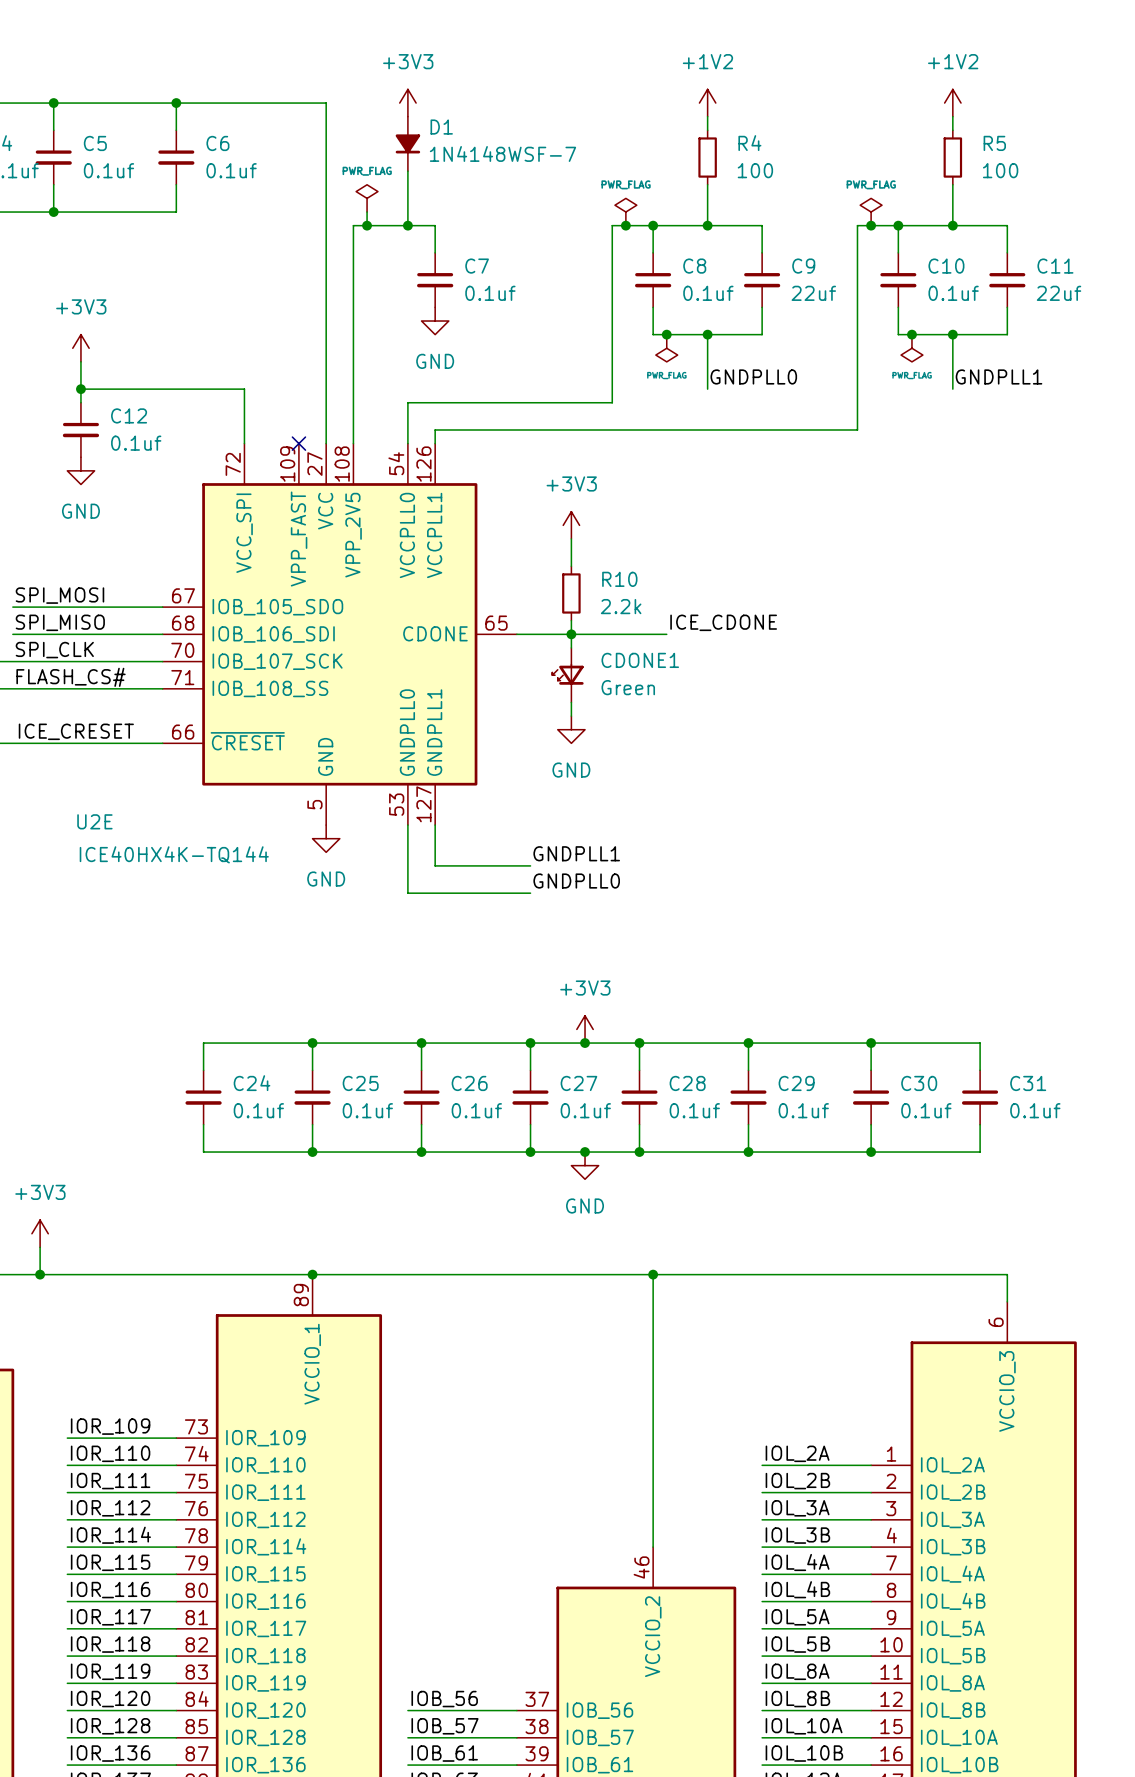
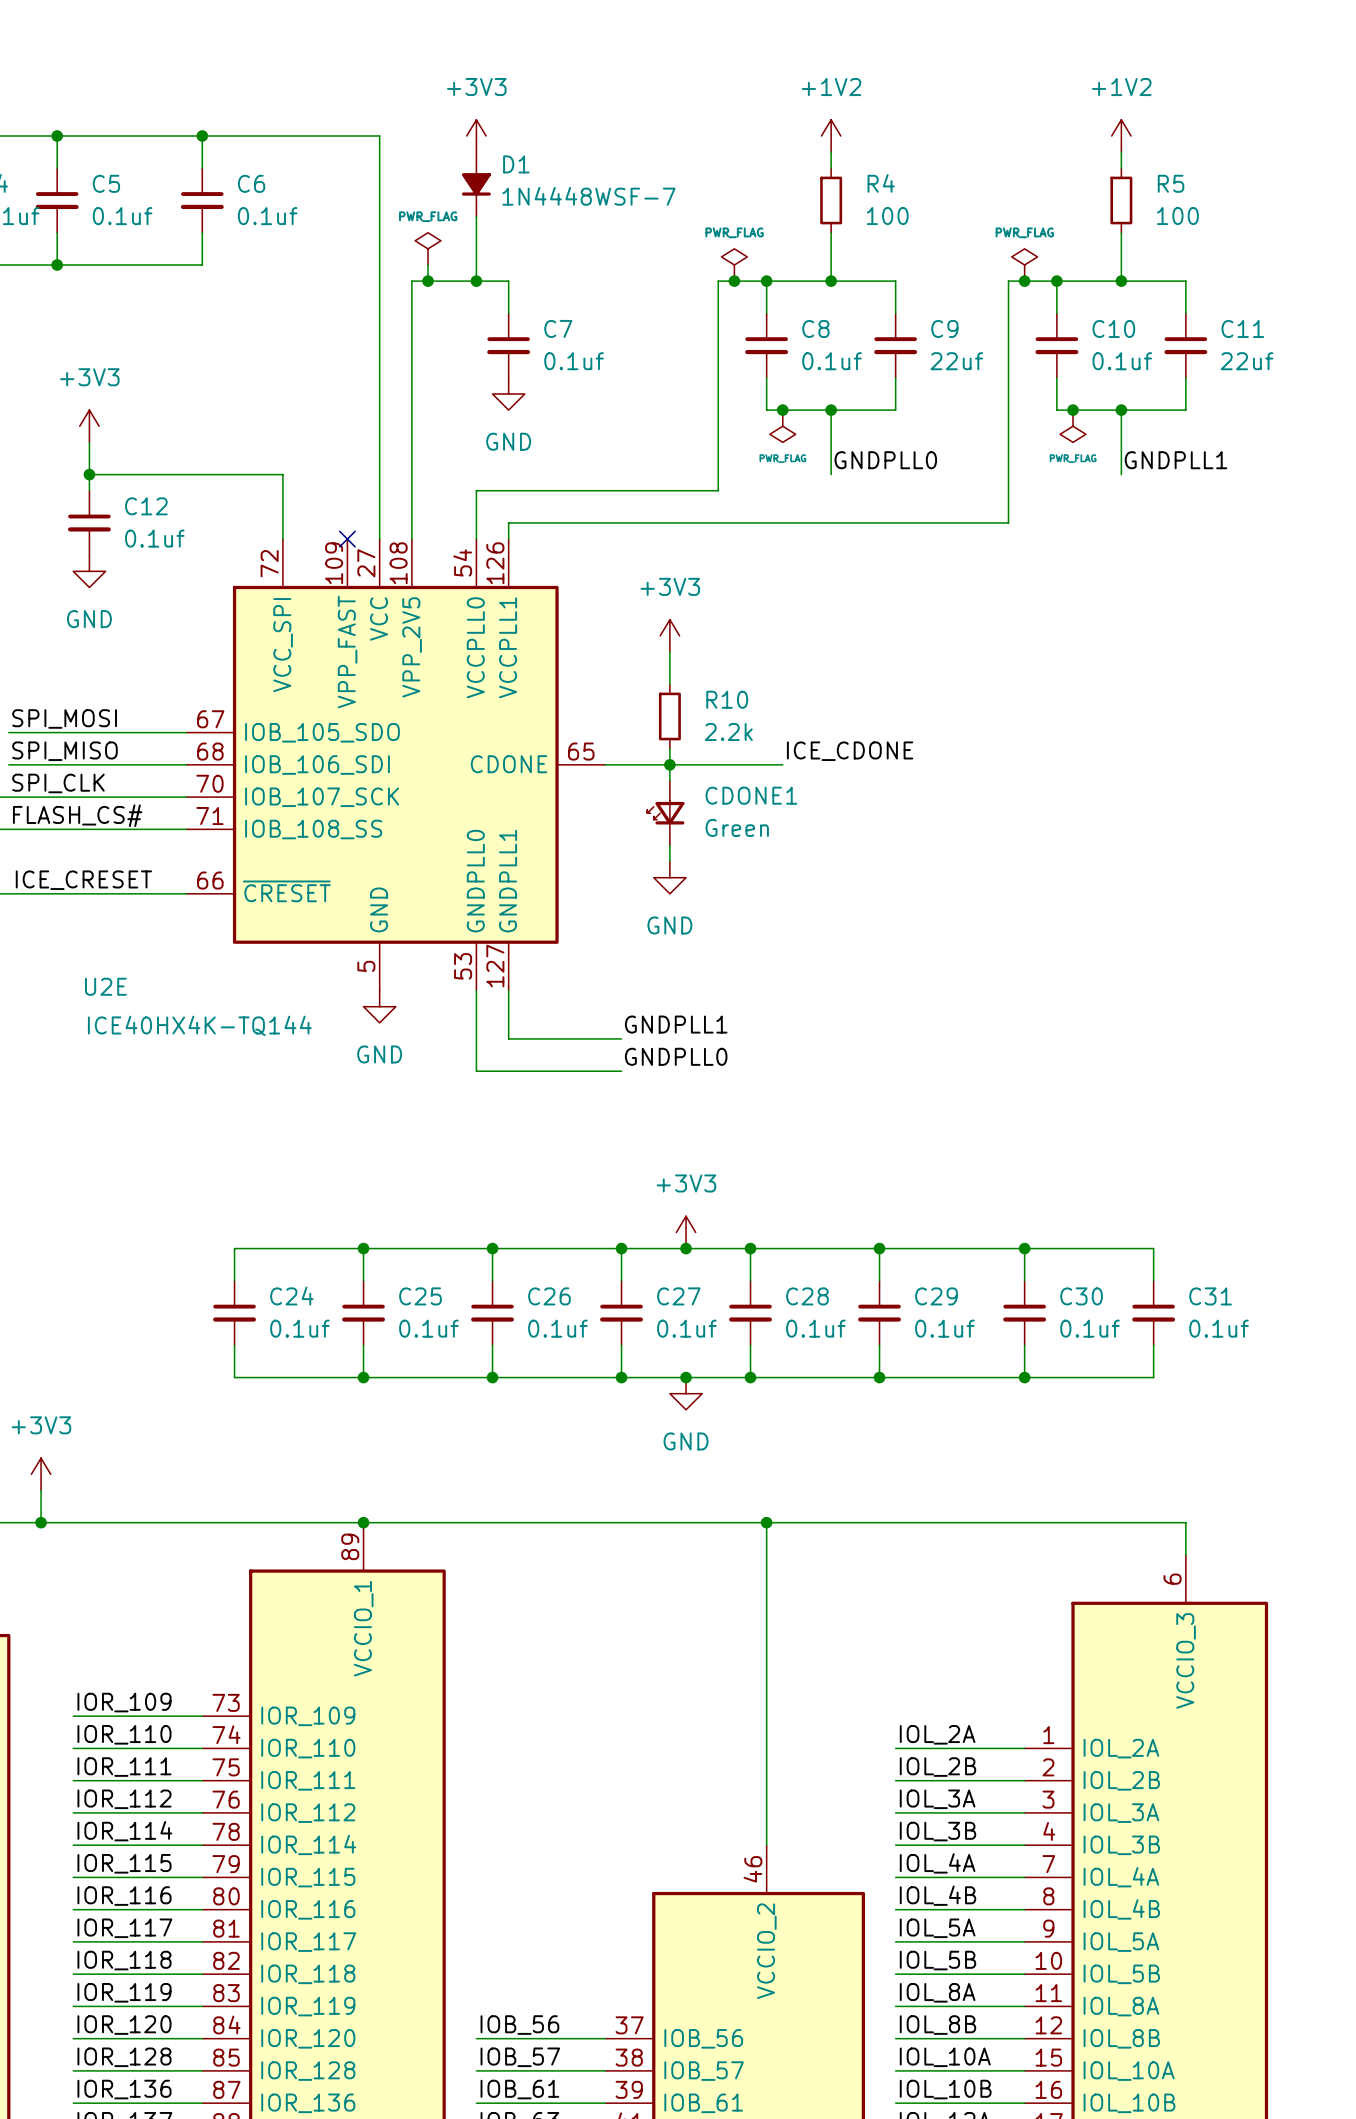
D1 value: 1N4148WSF-7 (502, 153) -> 1N4448WSF-7 (588, 196)

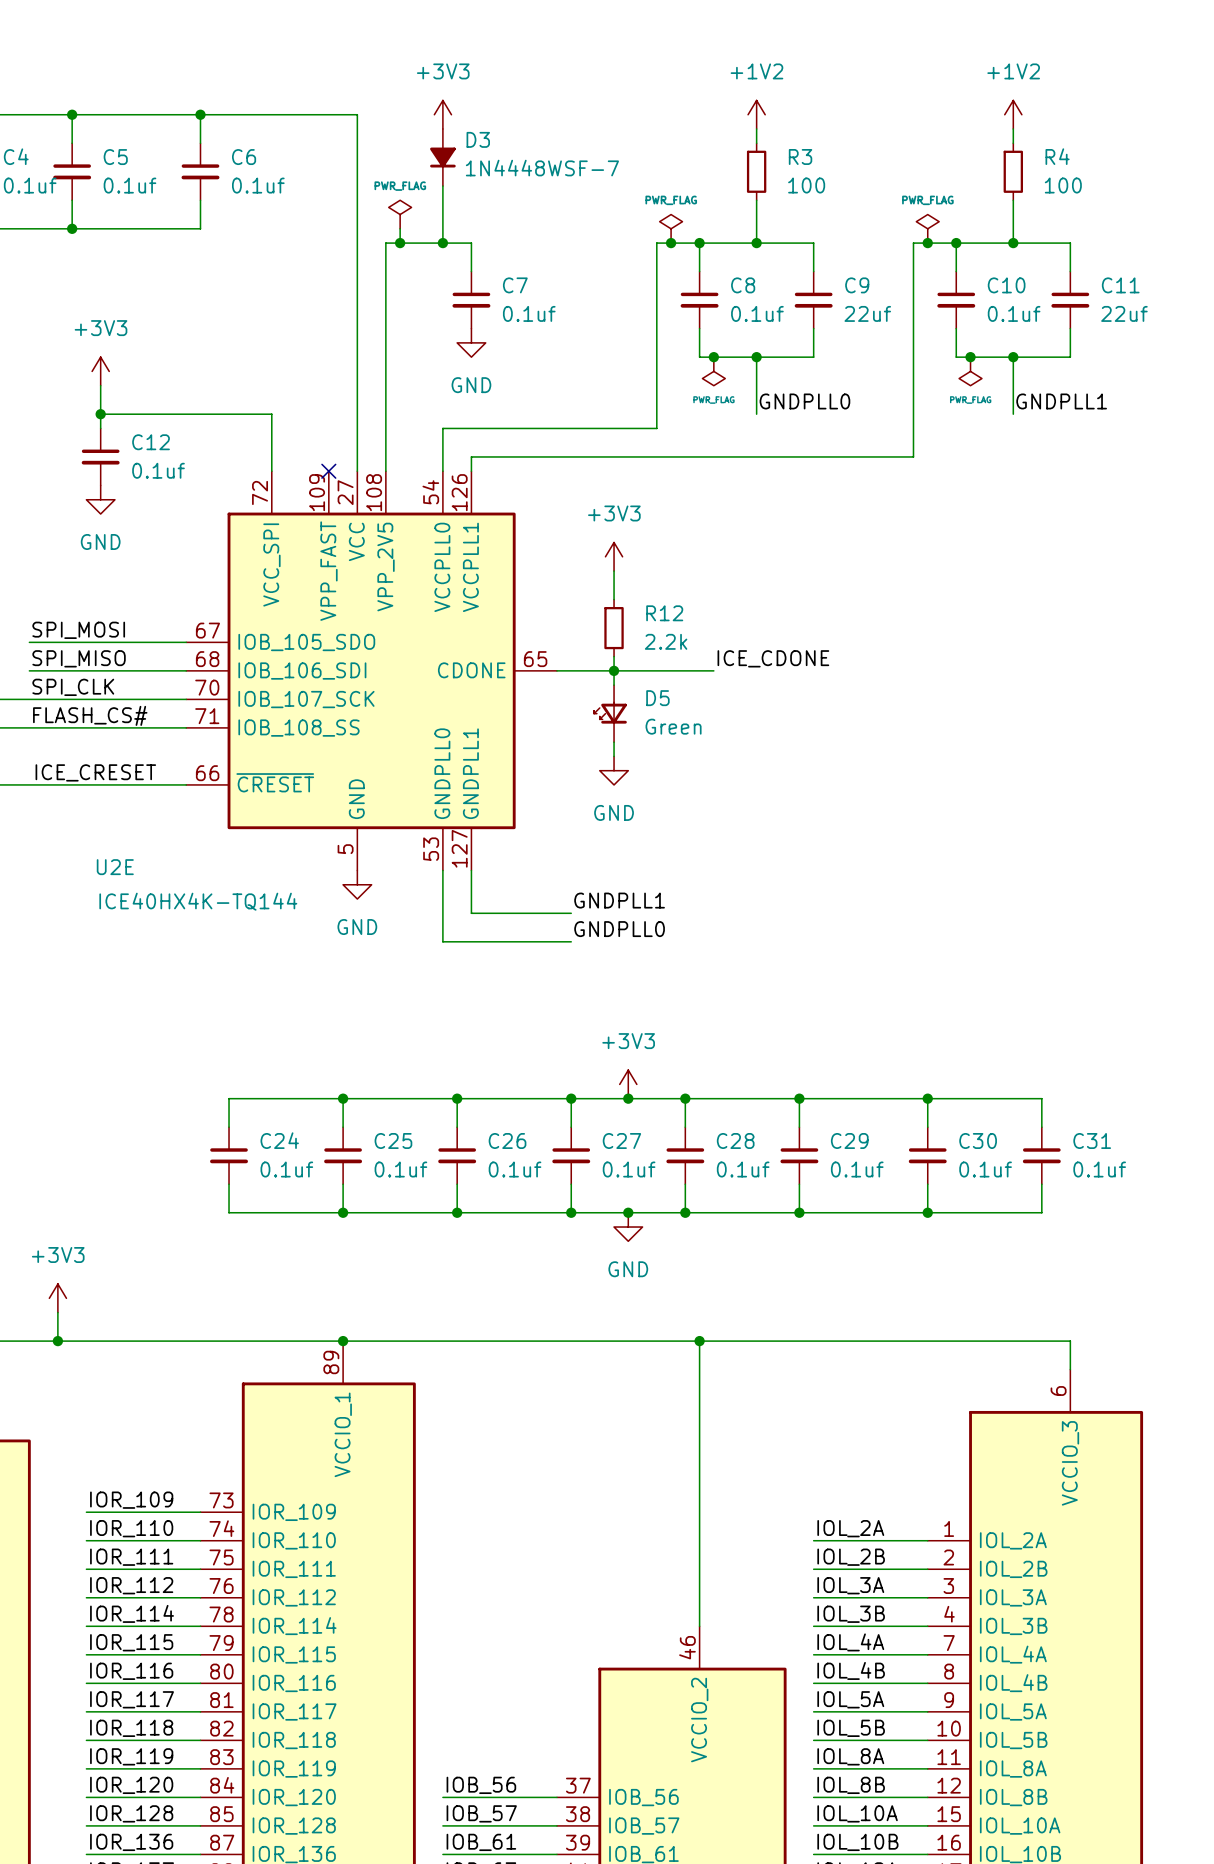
D1 name: D1 (516, 164) -> D3 (478, 139)
R4 name: R4 (881, 183) -> R3 (800, 156)
R5 name: R5 (1171, 183) -> R4 (1057, 156)
R10 name: R10 (727, 699) -> R12 (664, 613)
CDONE1 name: CDONE1 (751, 795) -> D5 (657, 698)

